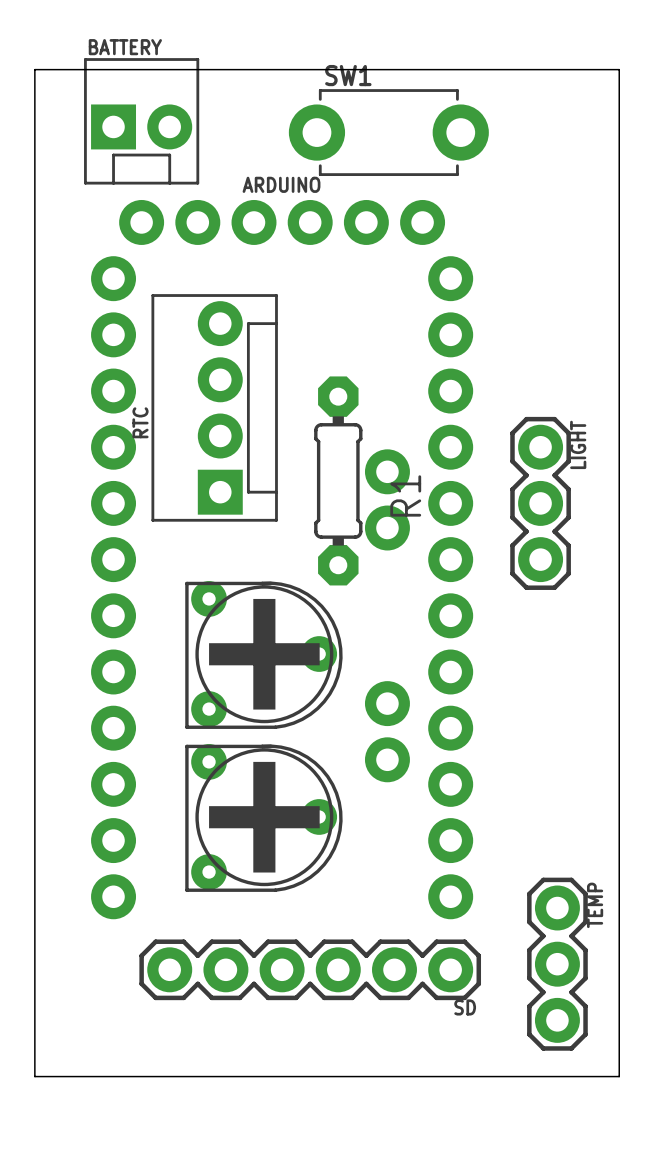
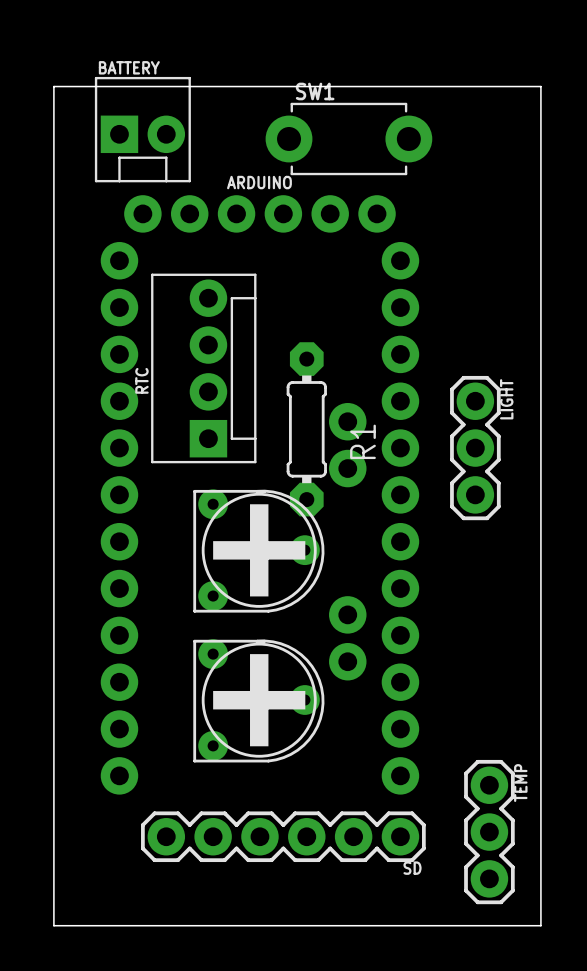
part position: (263, 655) -> (258, 550)
part position: (263, 817) -> (258, 700)

